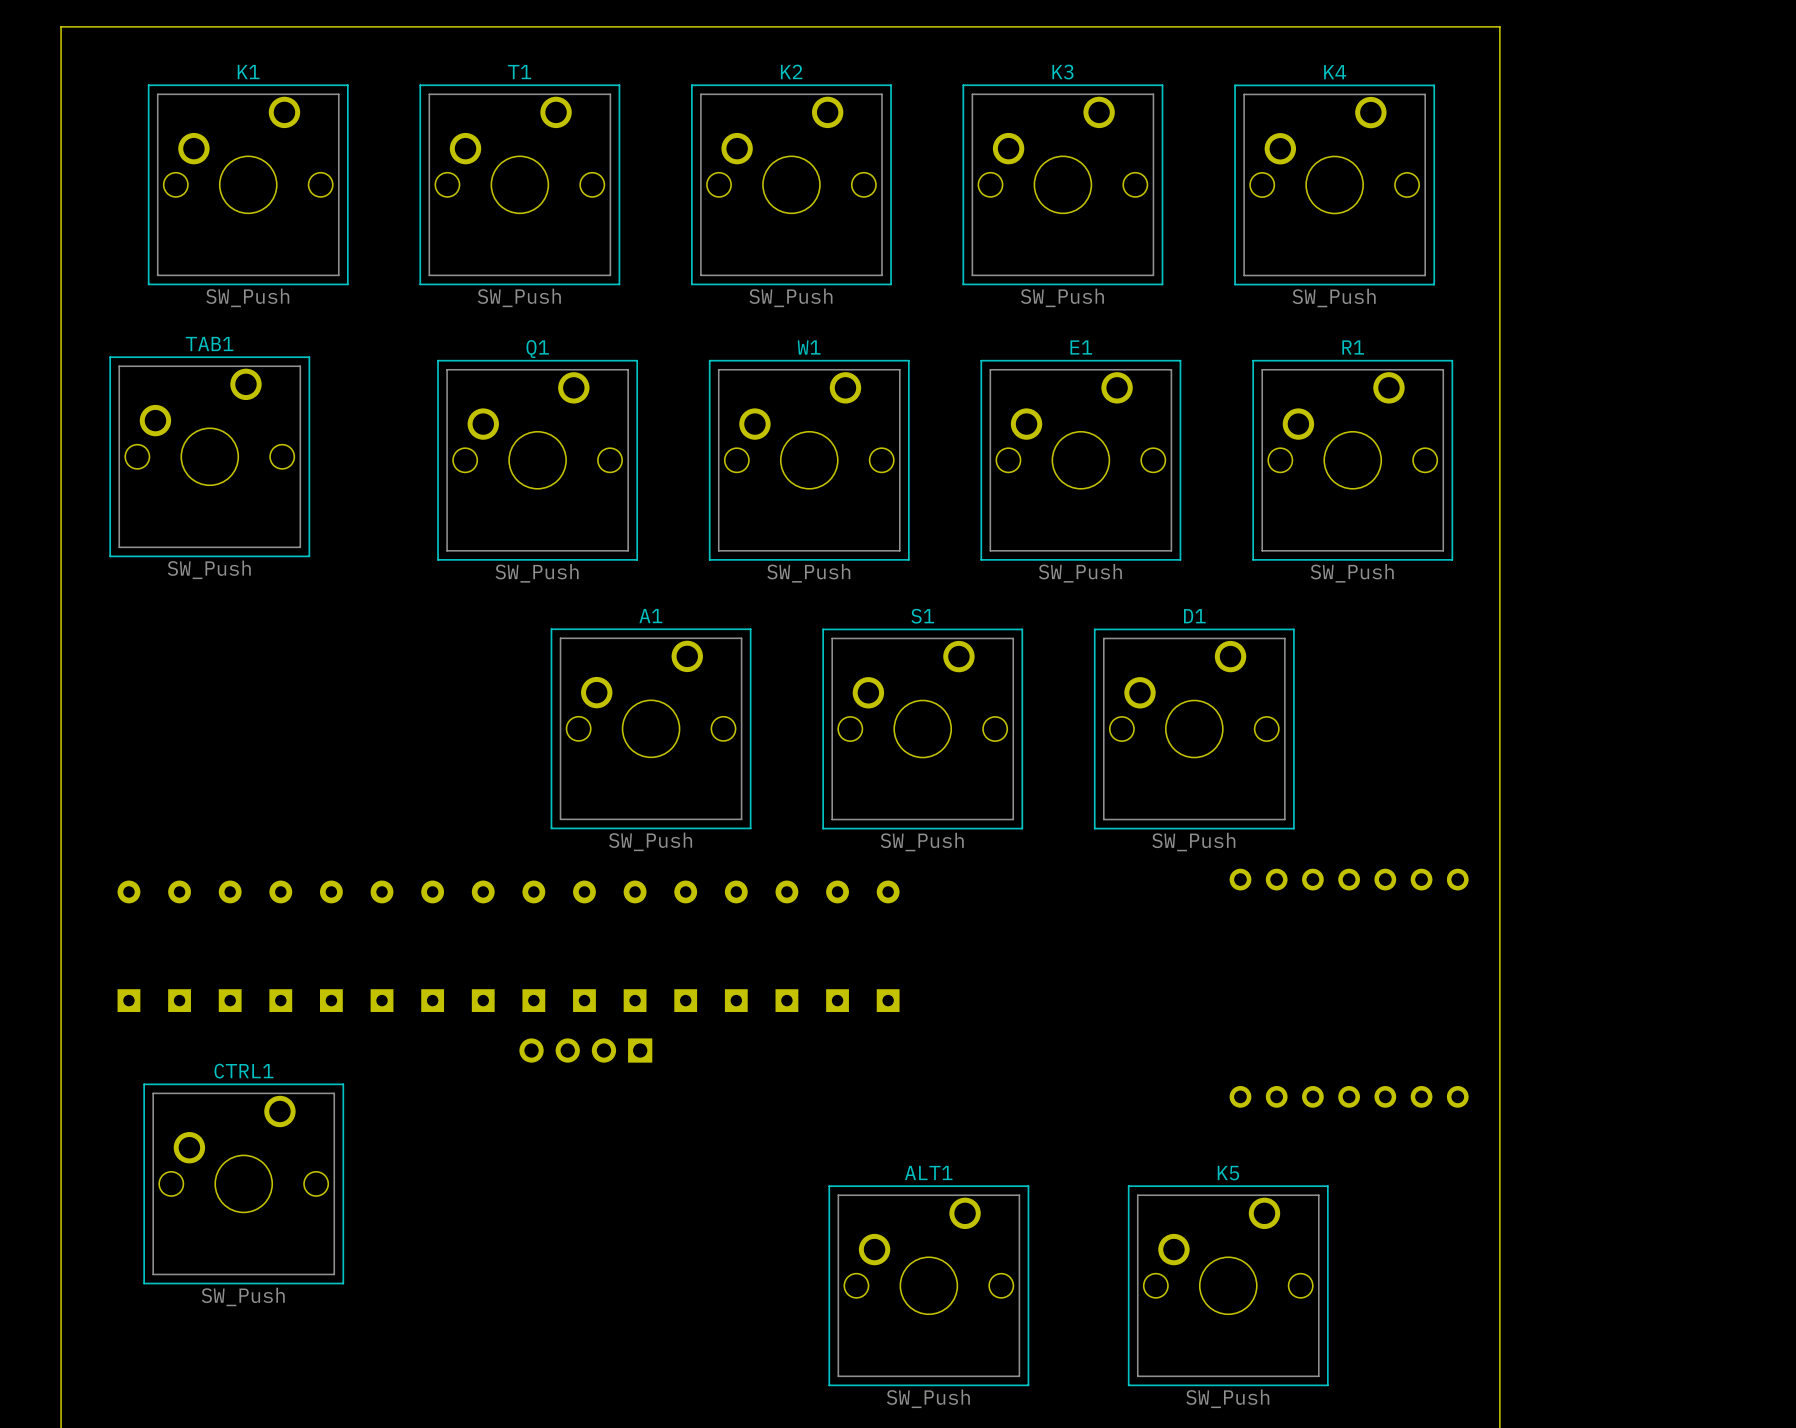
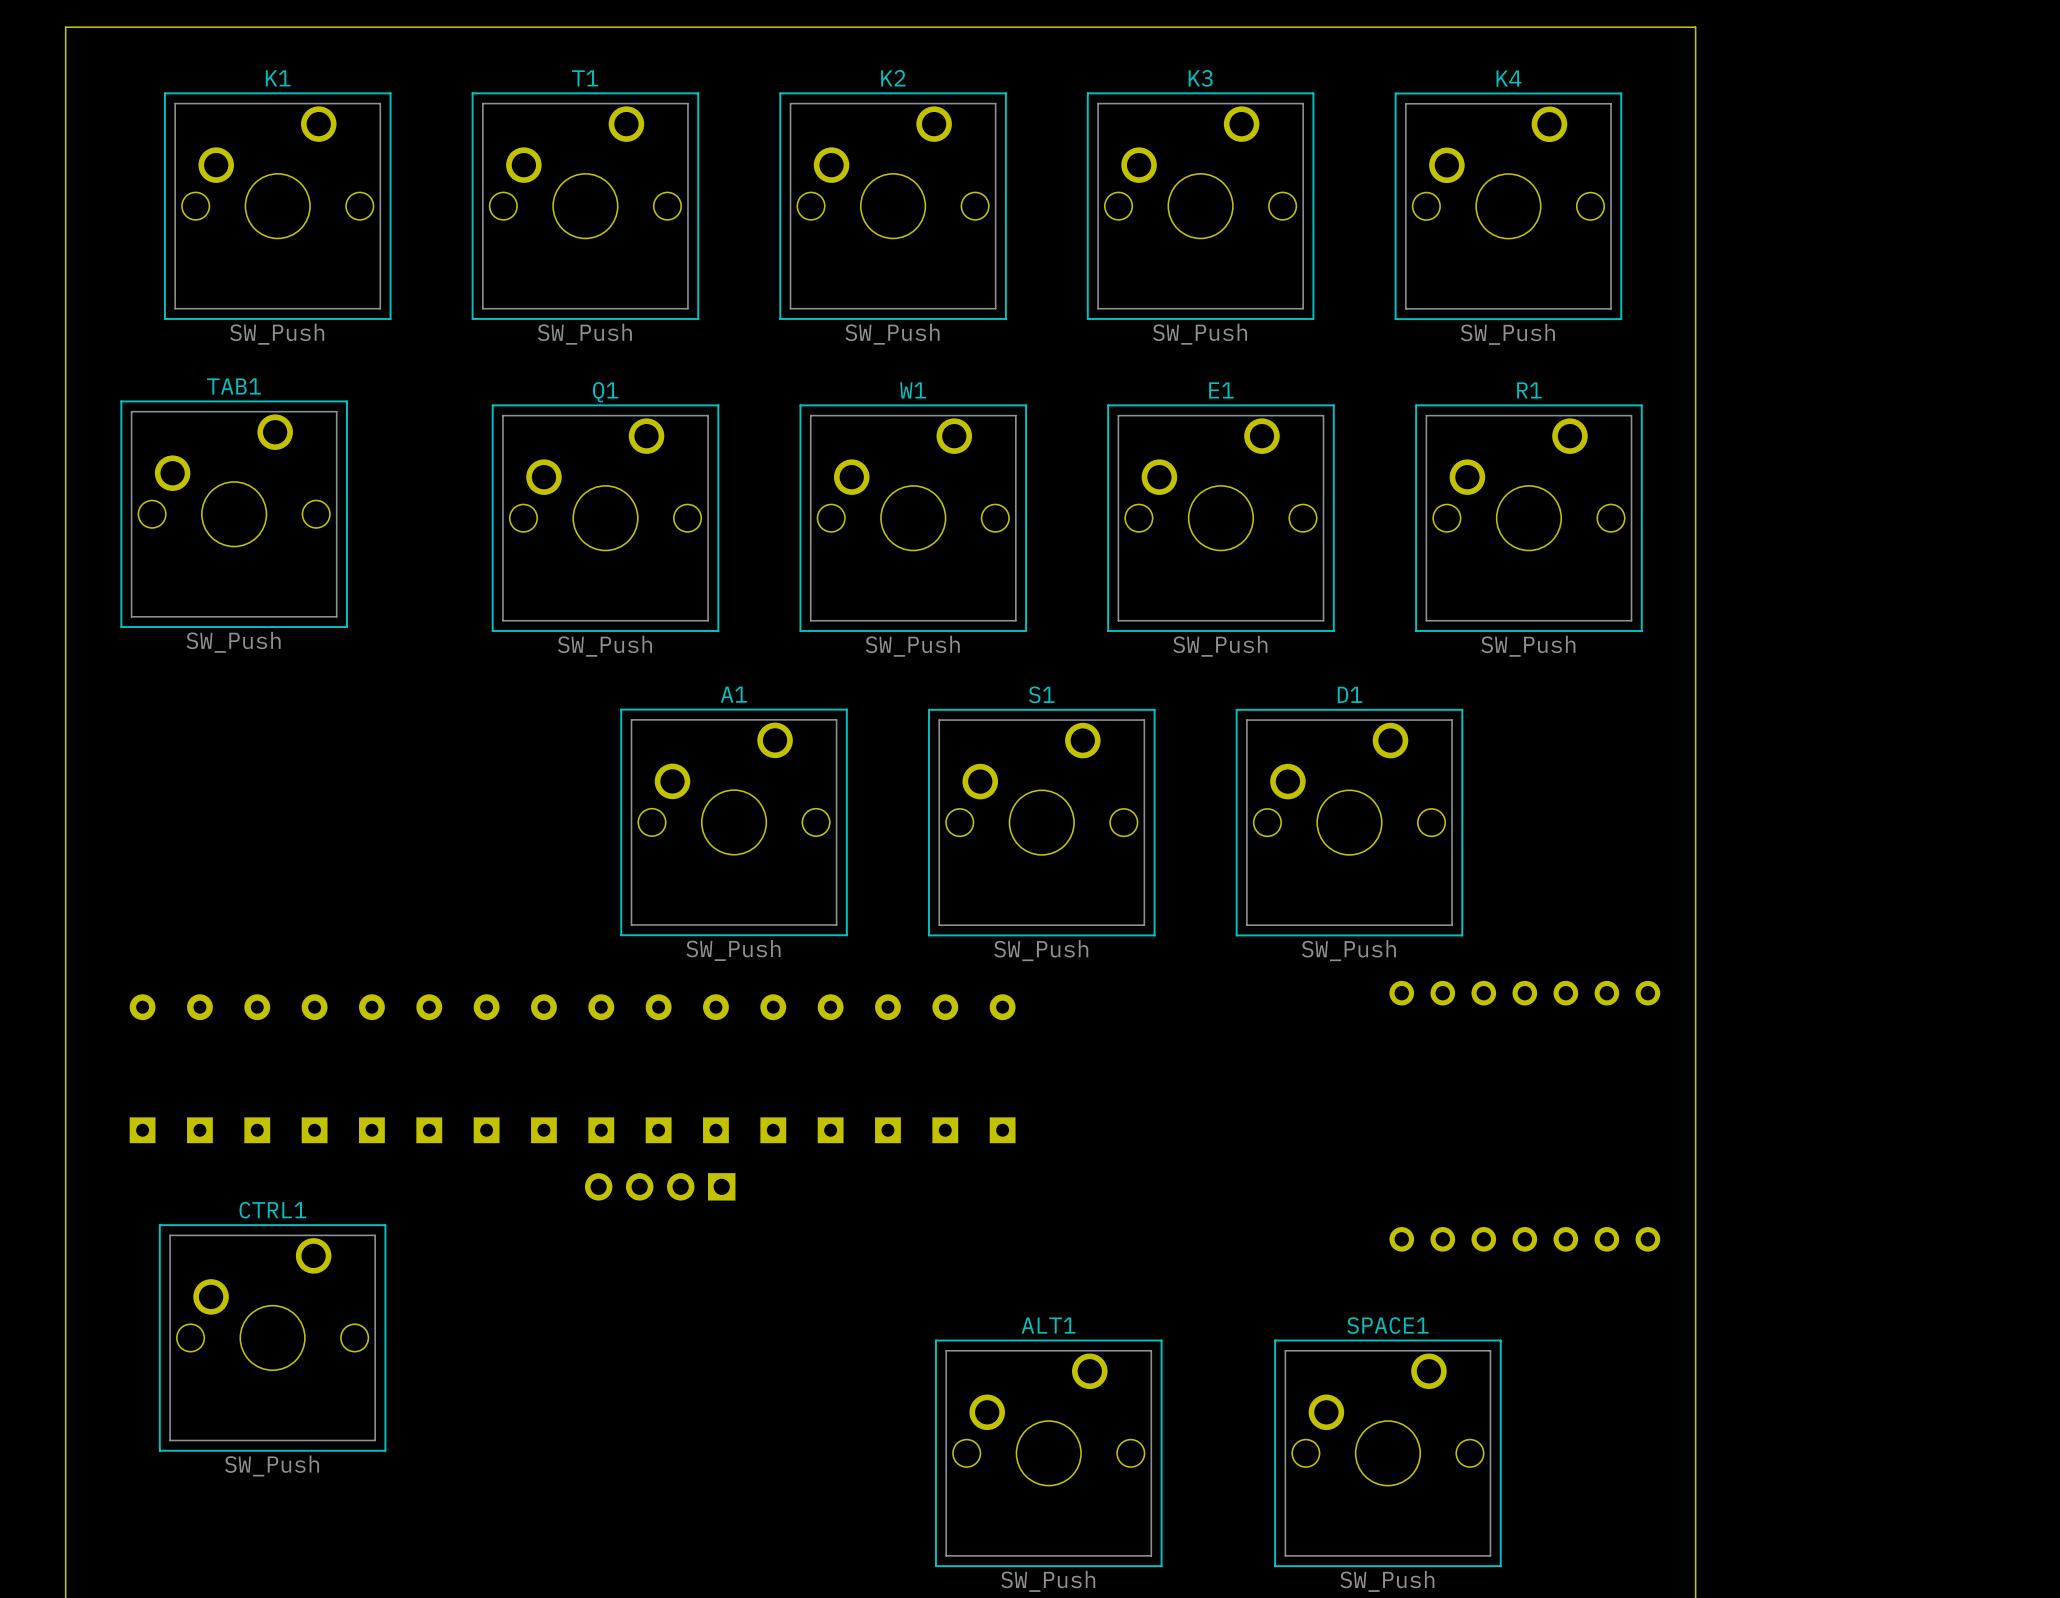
K5 name: K5 (1228, 1173) -> SPACE1 (1387, 1325)

